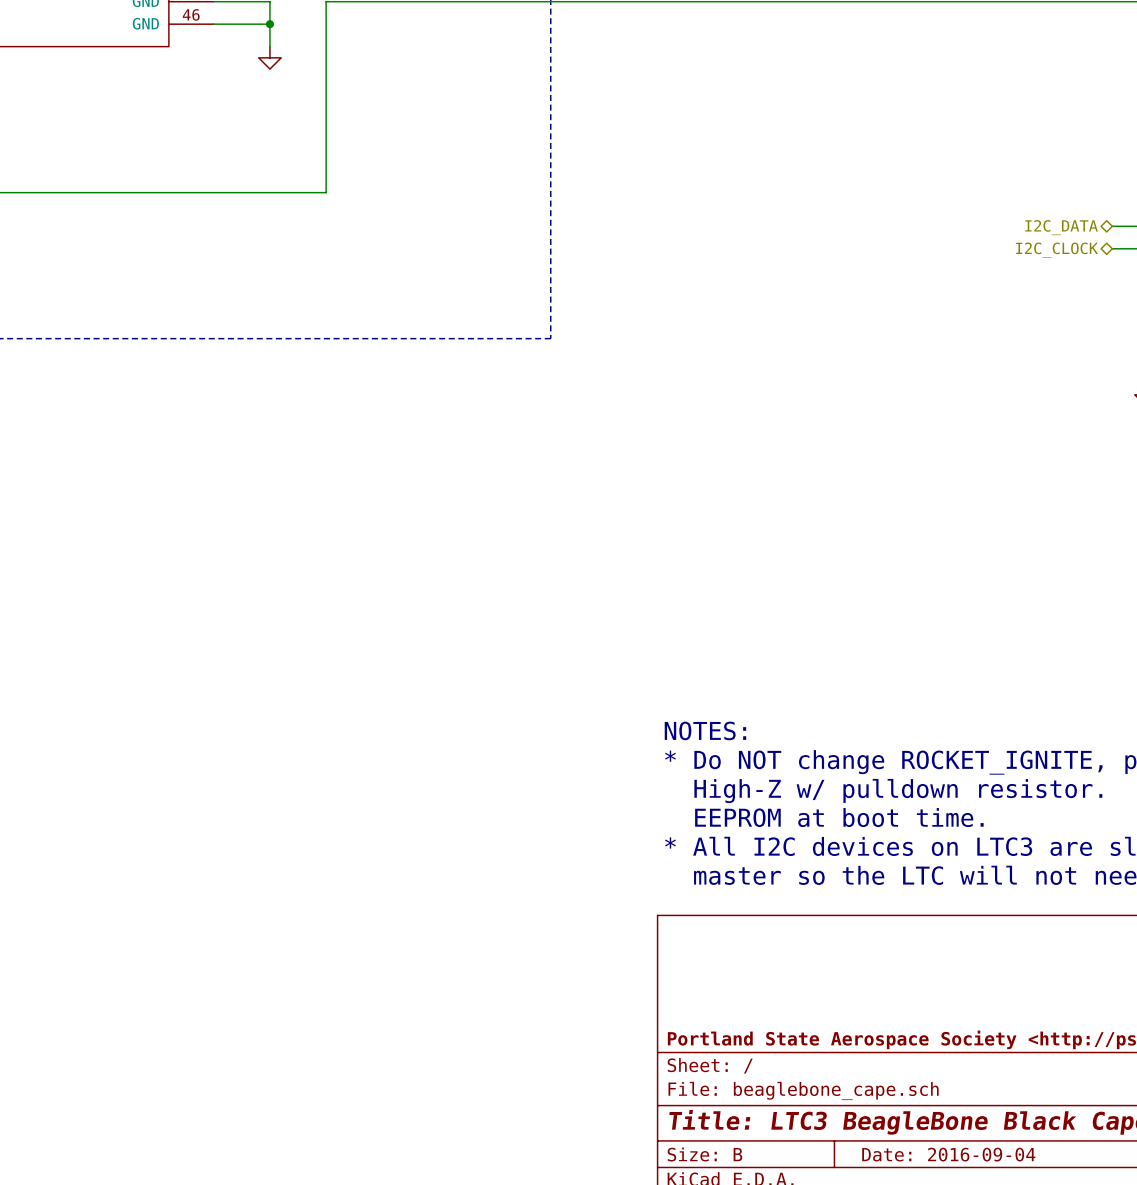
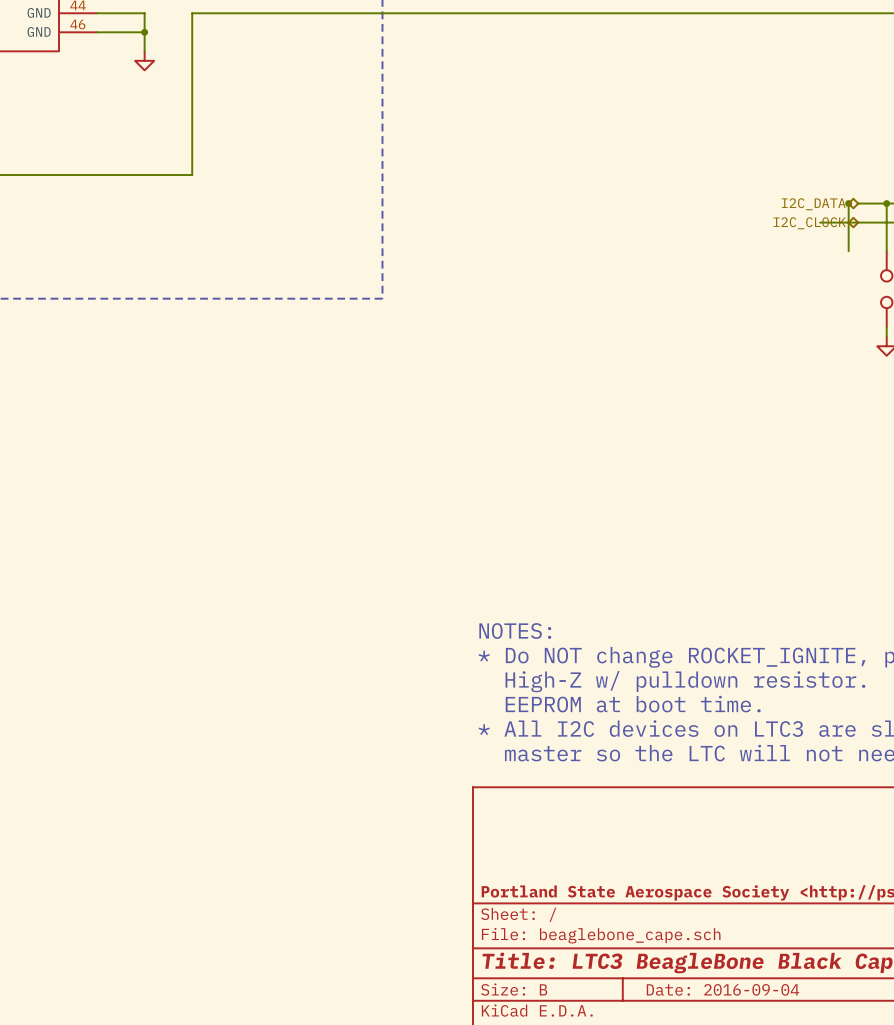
wire: none -> (848, 203) (848, 251)
junction: none -> (848, 203)
wire: none -> (820, 222) (858, 222)

